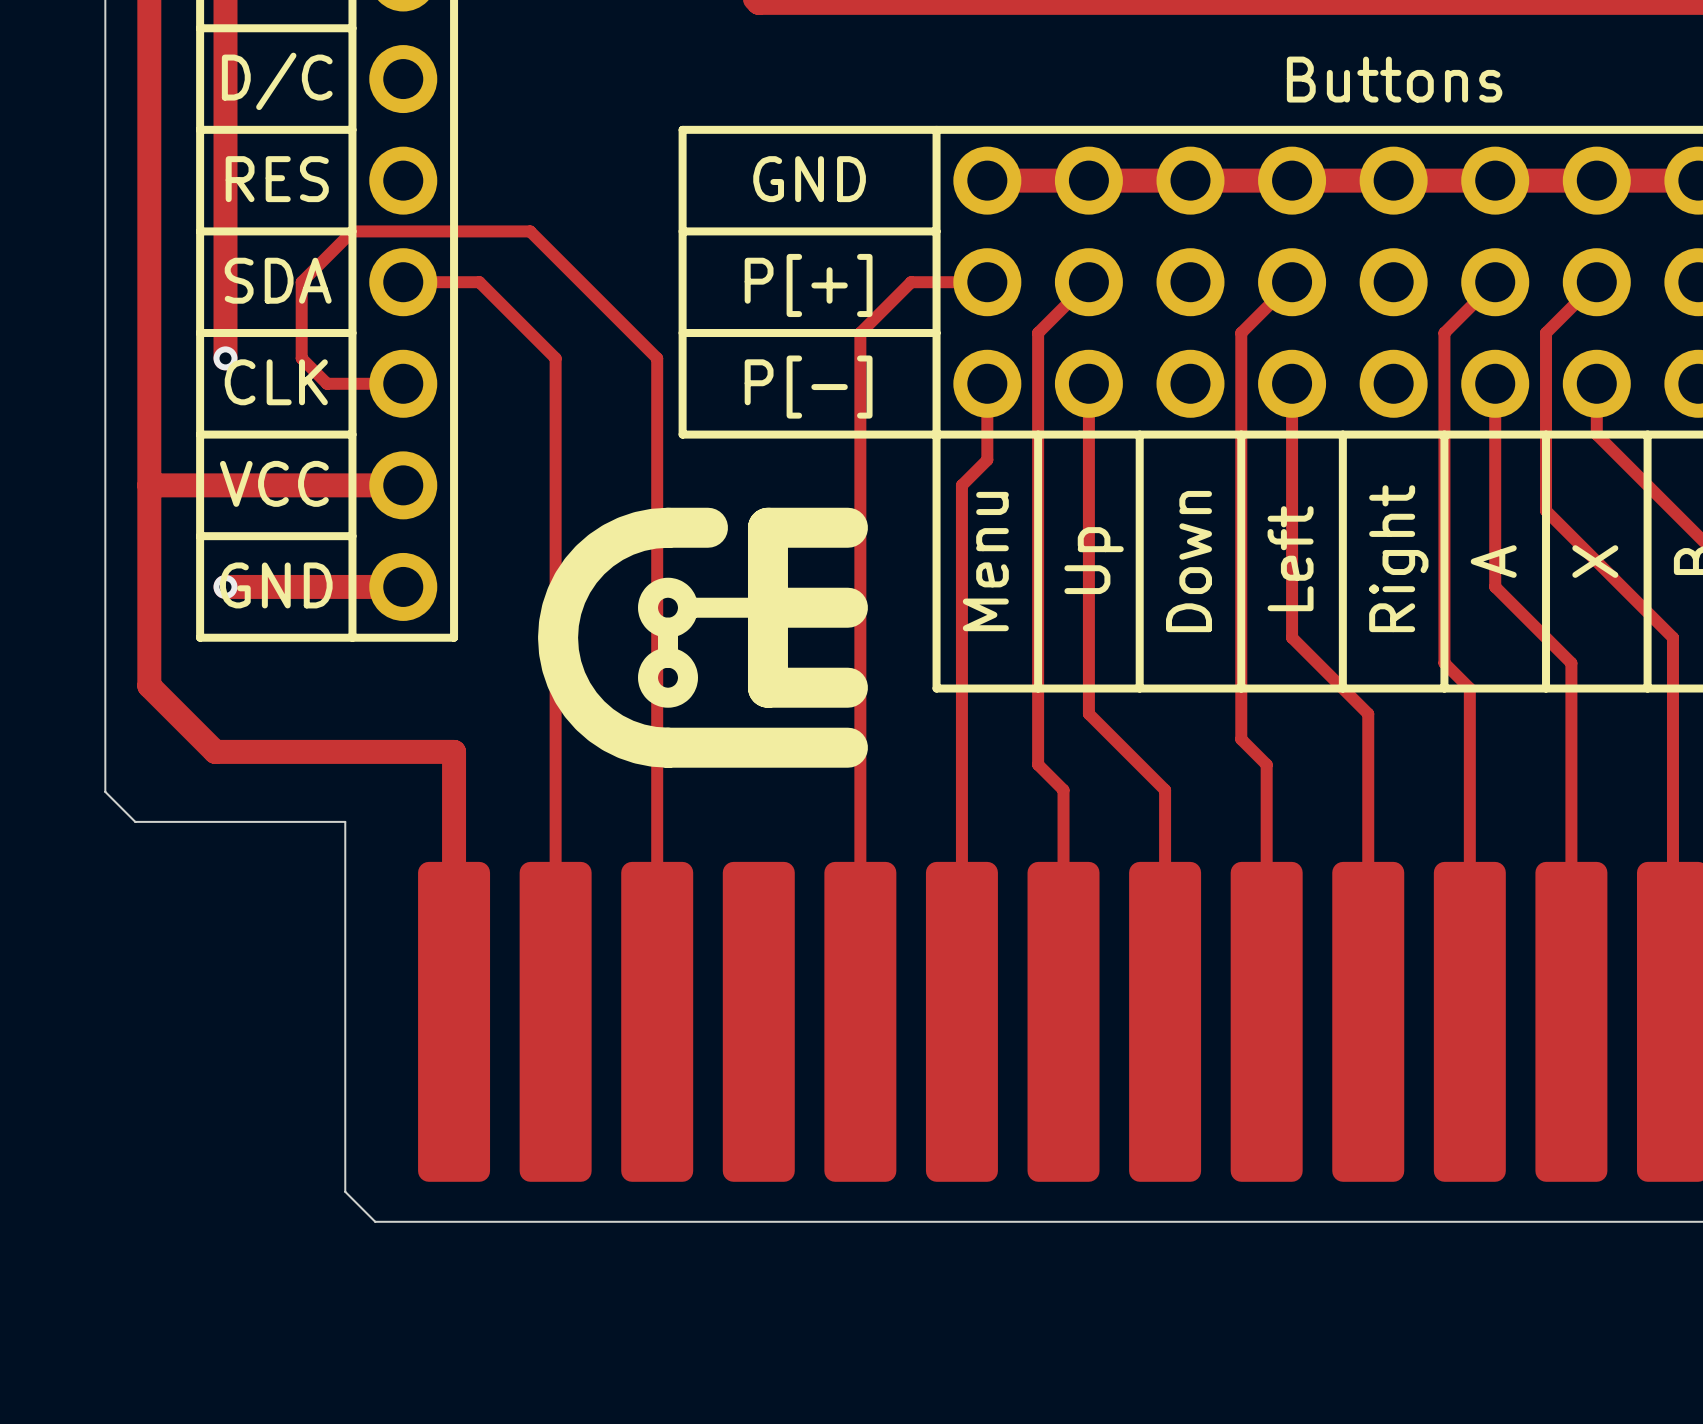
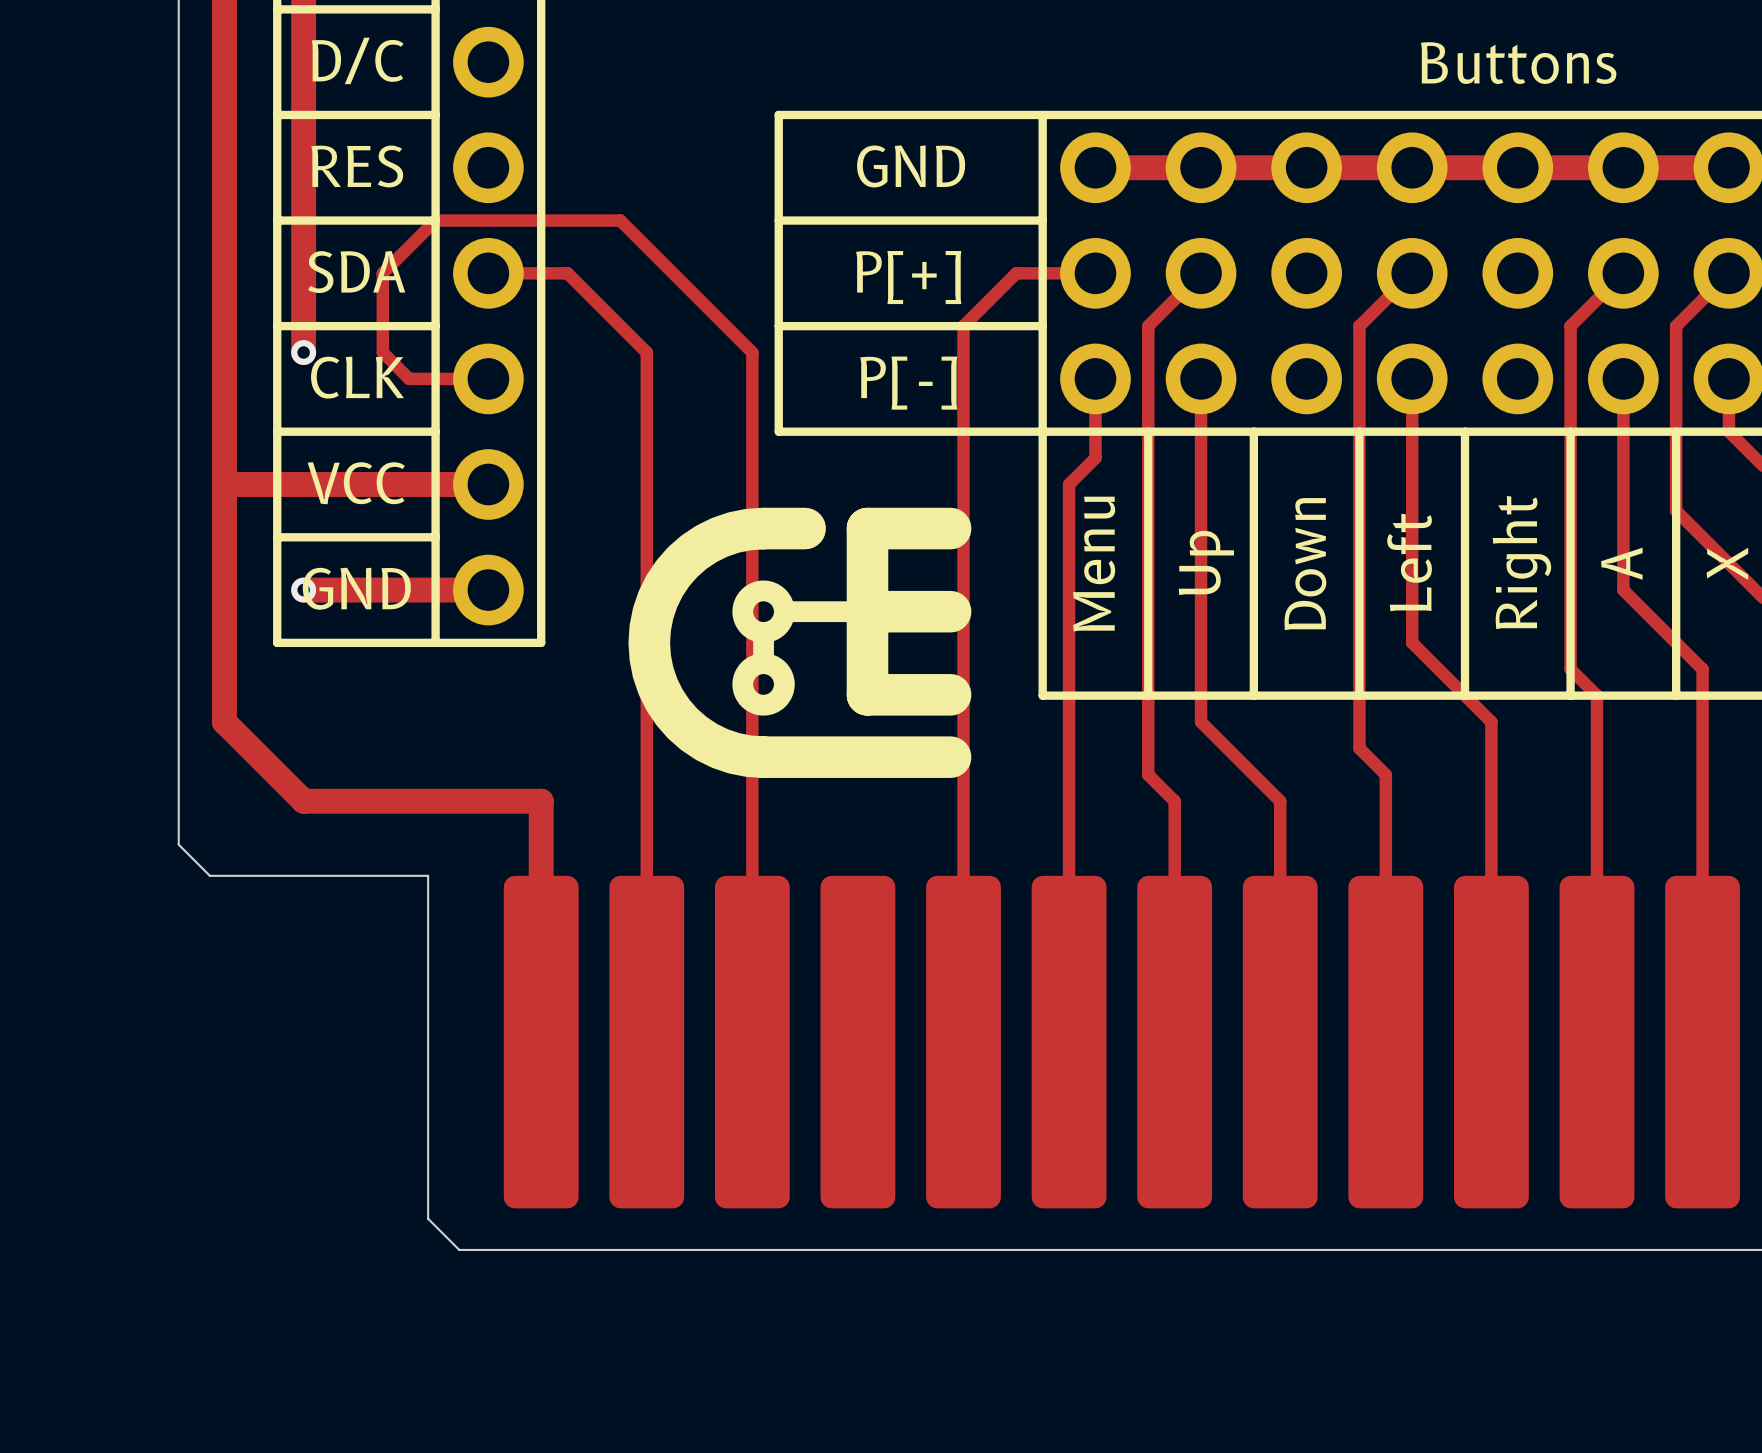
track: (149, 685) (215, 751) (454, 751) (454, 790) -> (224, 692) (224, 722) (303, 801) (541, 801)
board edge: (105, 791) (135, 821) (345, 821) (345, 861) -> (178, 803) (178, 844) (209, 875) (428, 875)

